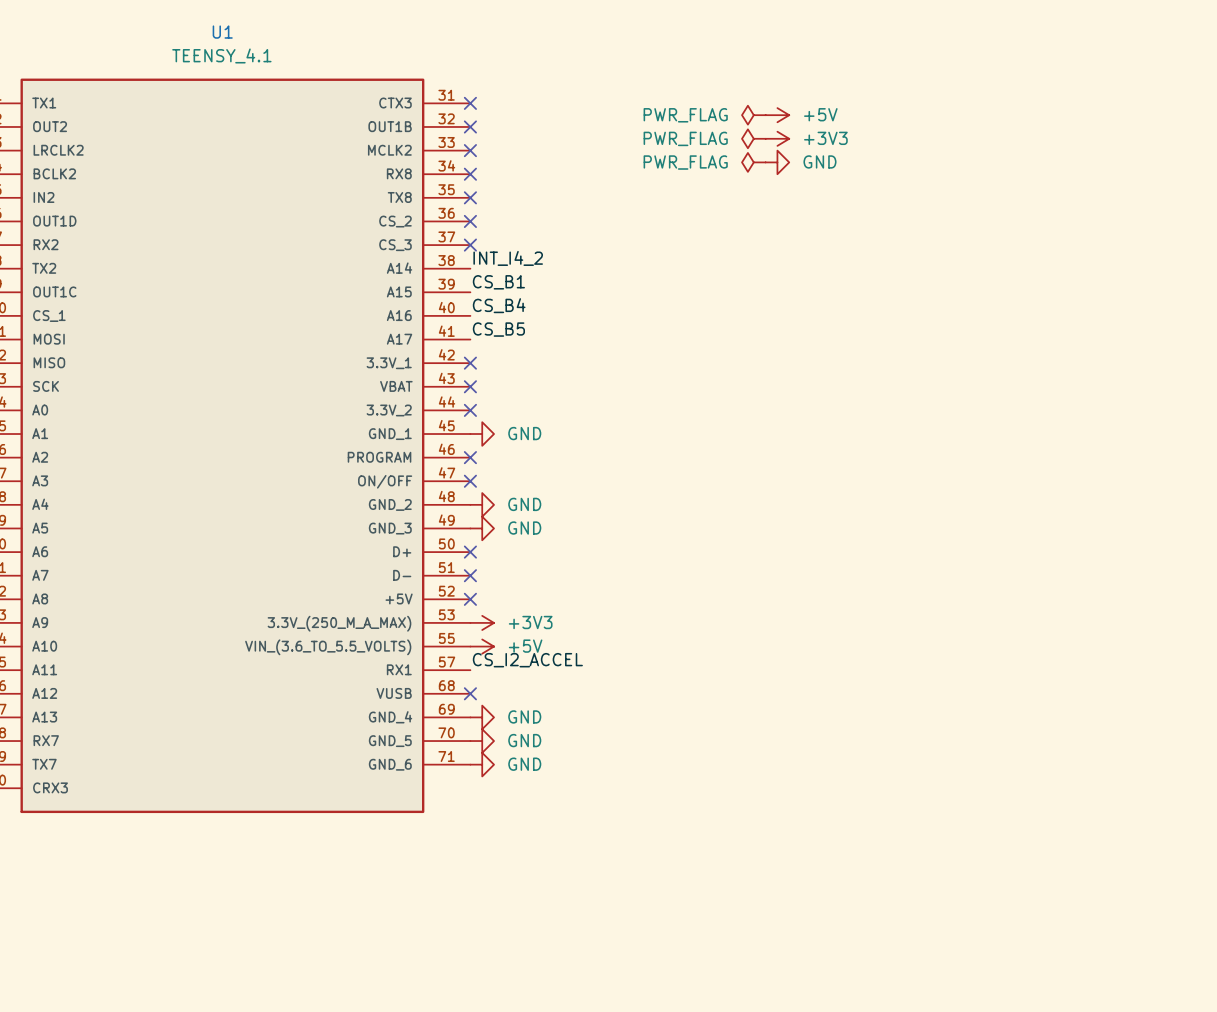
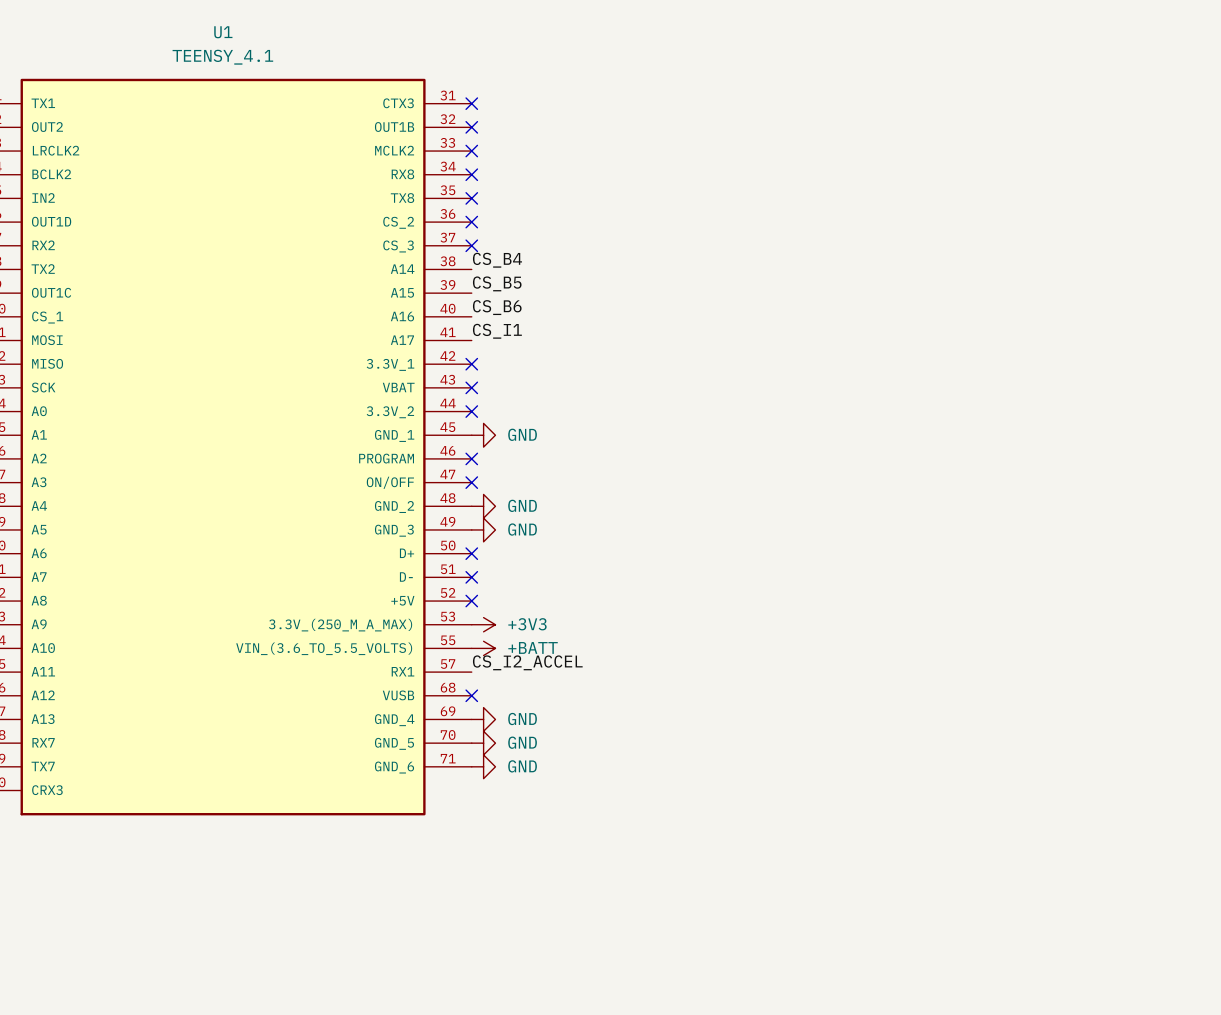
power symbol: PWR_FLAG (753, 115) -> none
power symbol: +5V (777, 115) -> none
power symbol: PWR_FLAG (753, 138) -> none
power symbol: +3V3 (777, 138) -> none
power symbol: PWR_FLAG (753, 162) -> none
power symbol: GND (777, 162) -> none
label: INT_I4_2 (508, 258) -> CS_B4 (497, 260)
label: CS_B1 (498, 282) -> CS_B5 (497, 283)
label: CS_B4 (499, 305) -> CS_B6 (497, 307)
label: CS_B5 (498, 329) -> CS_I1 (497, 331)
power symbol: +5V (482, 646) -> +BATT (483, 648)

